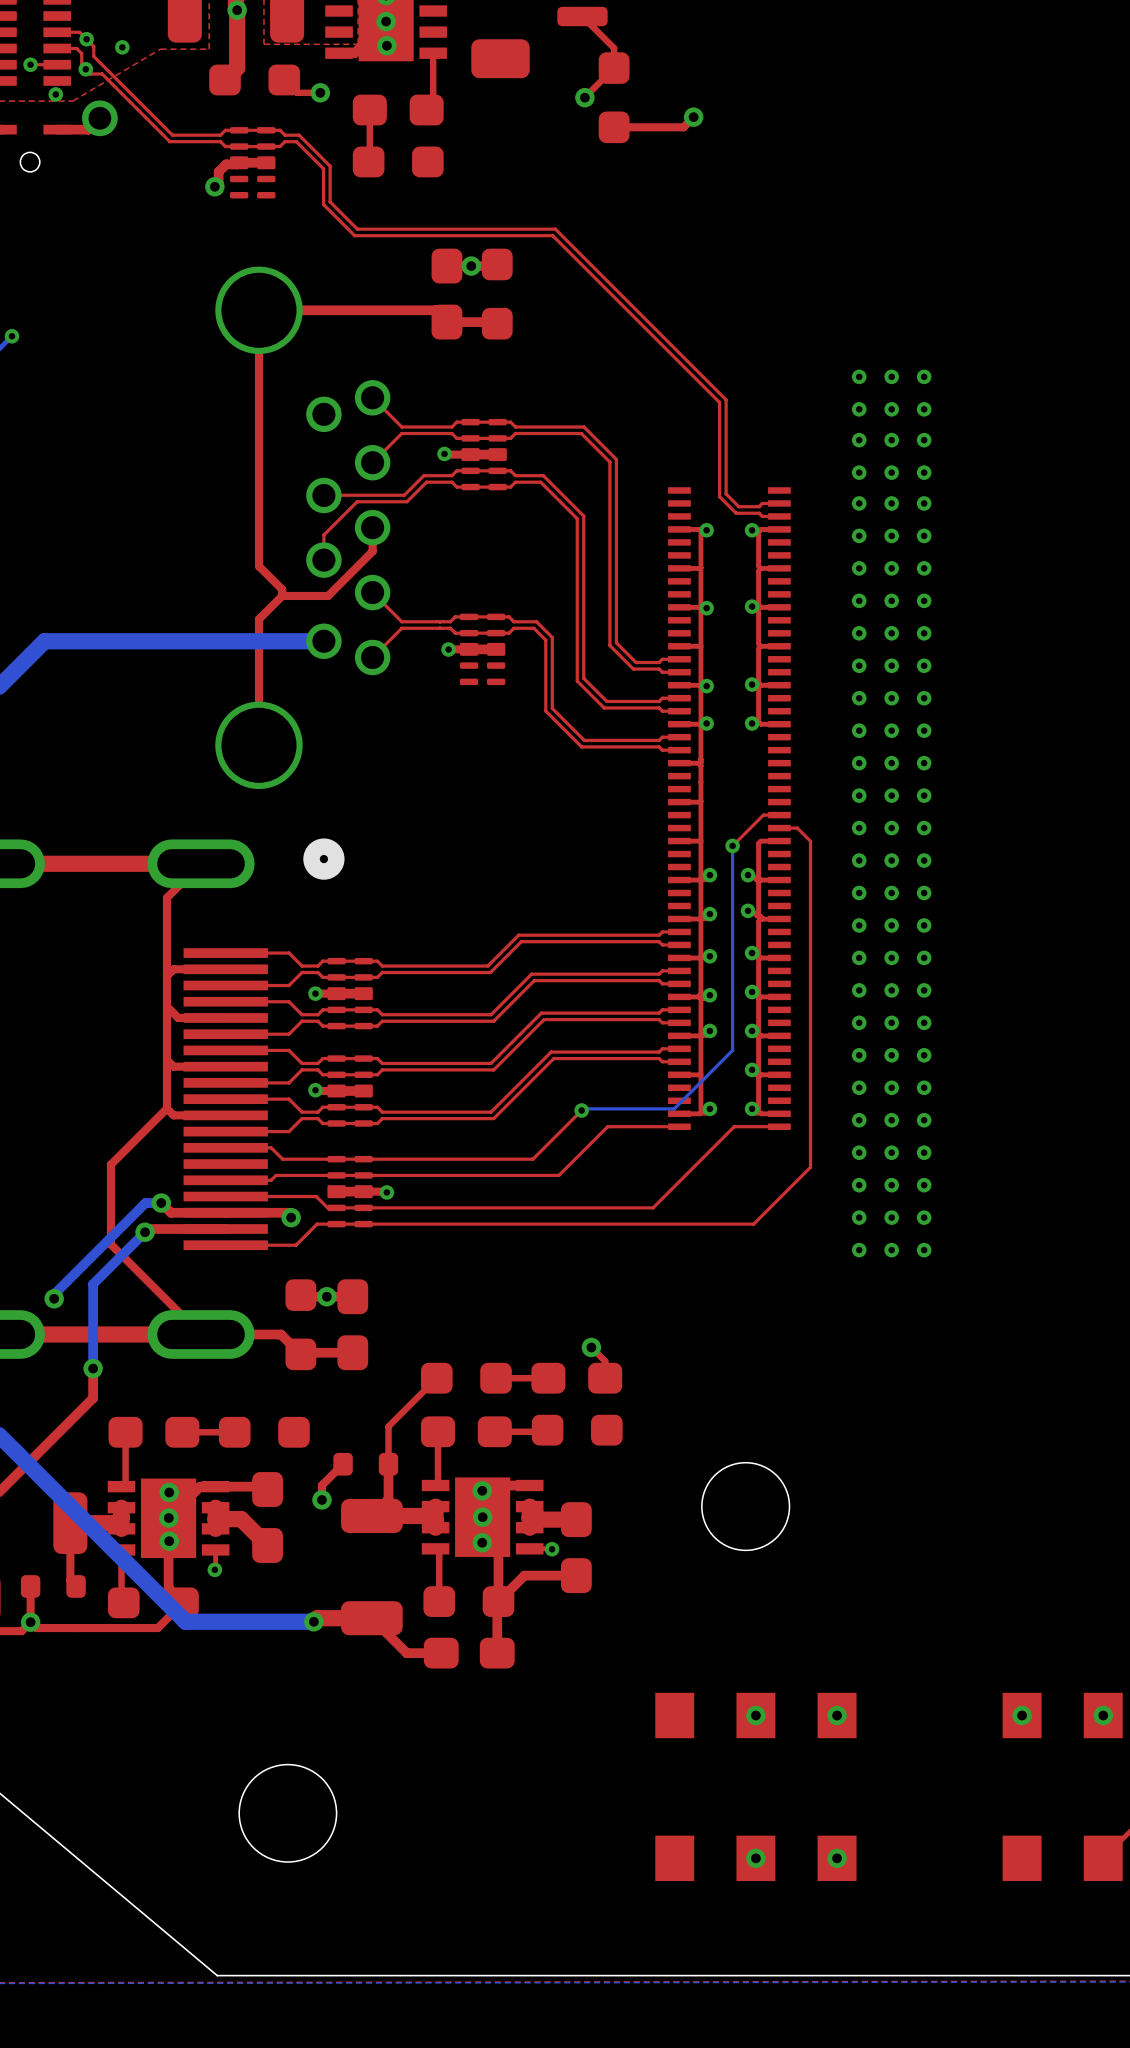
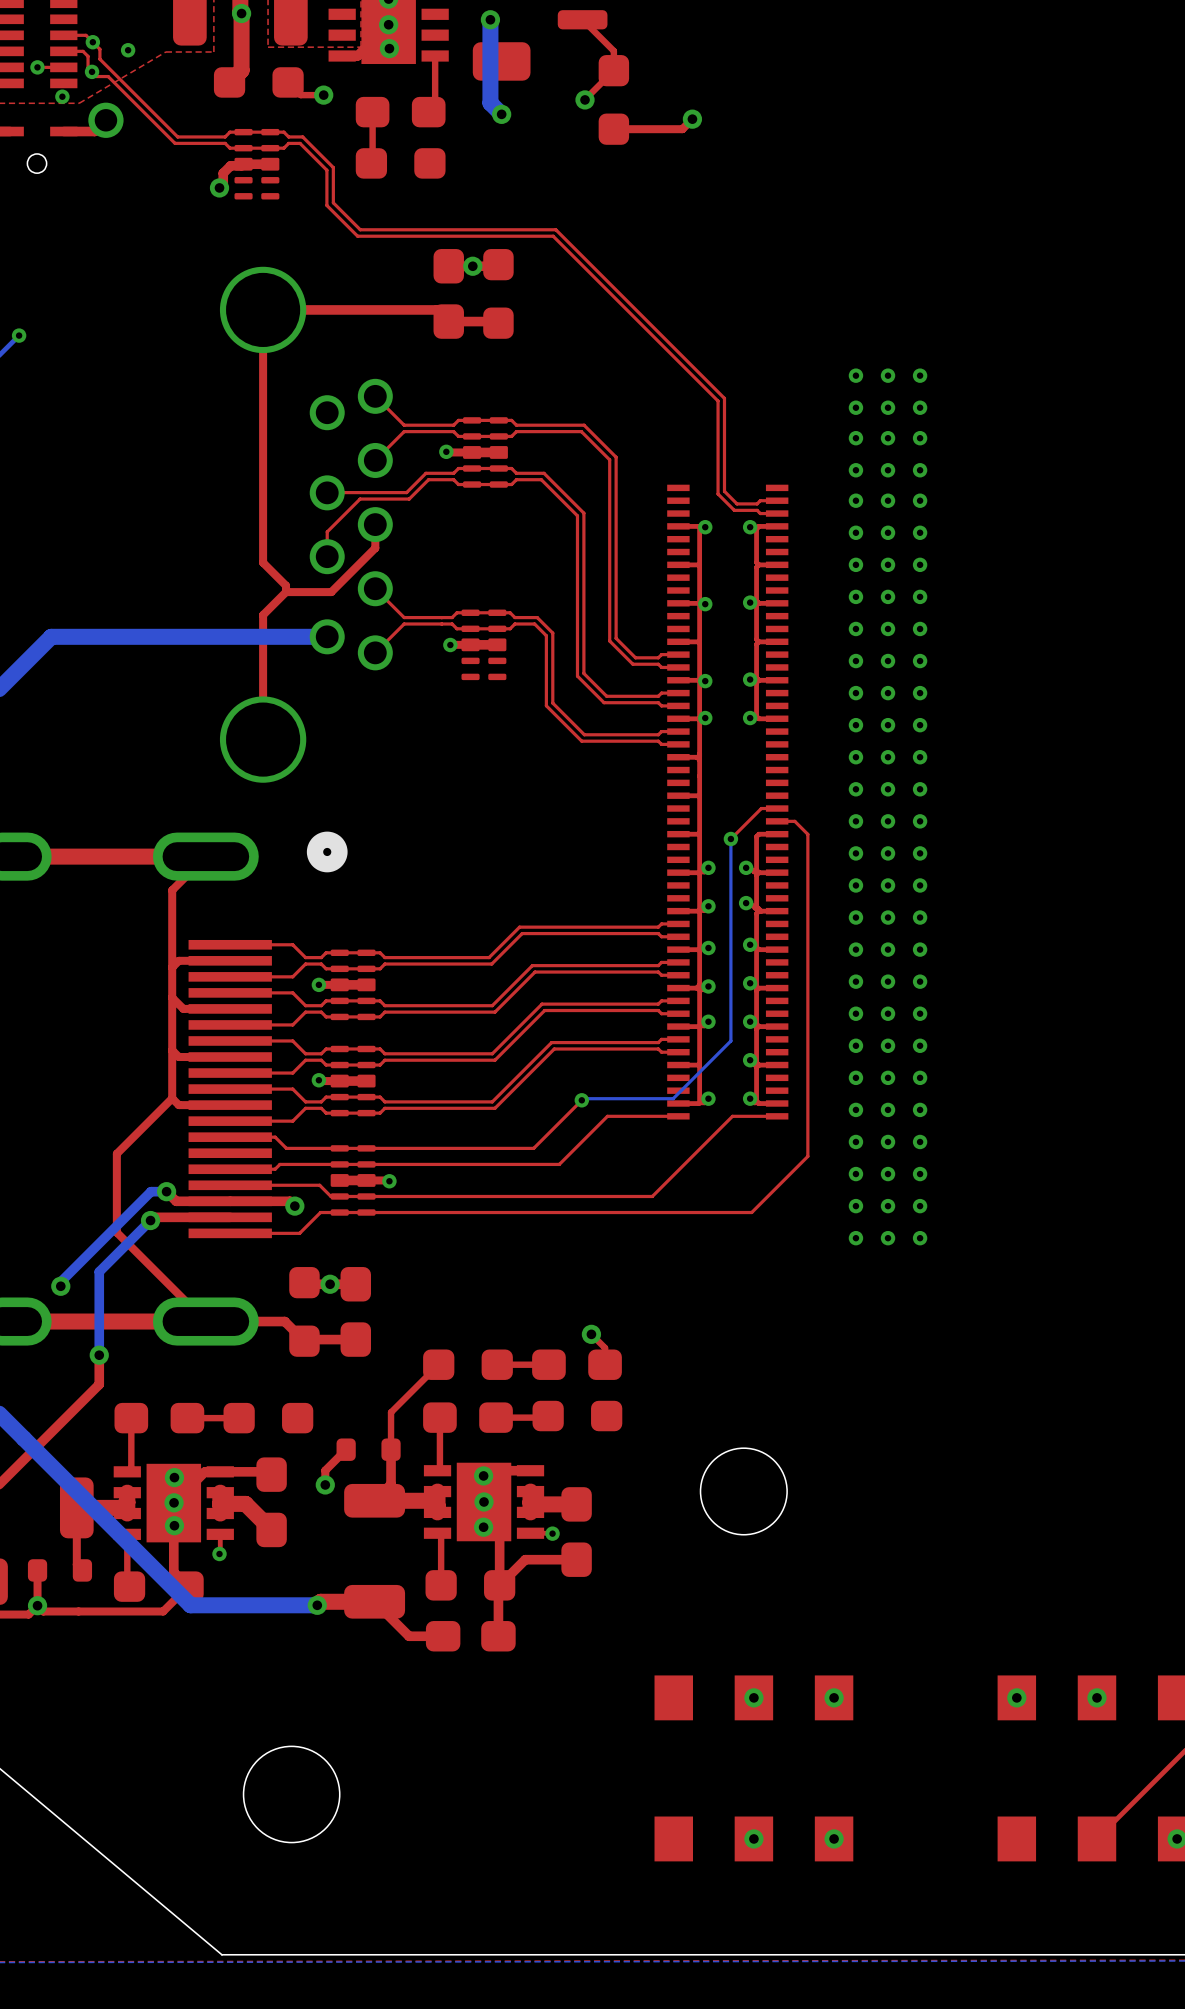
bottom track: none -> (490, 19) (490, 103) (501, 114)
via: none -> (490, 19)
via: none -> (501, 114)

